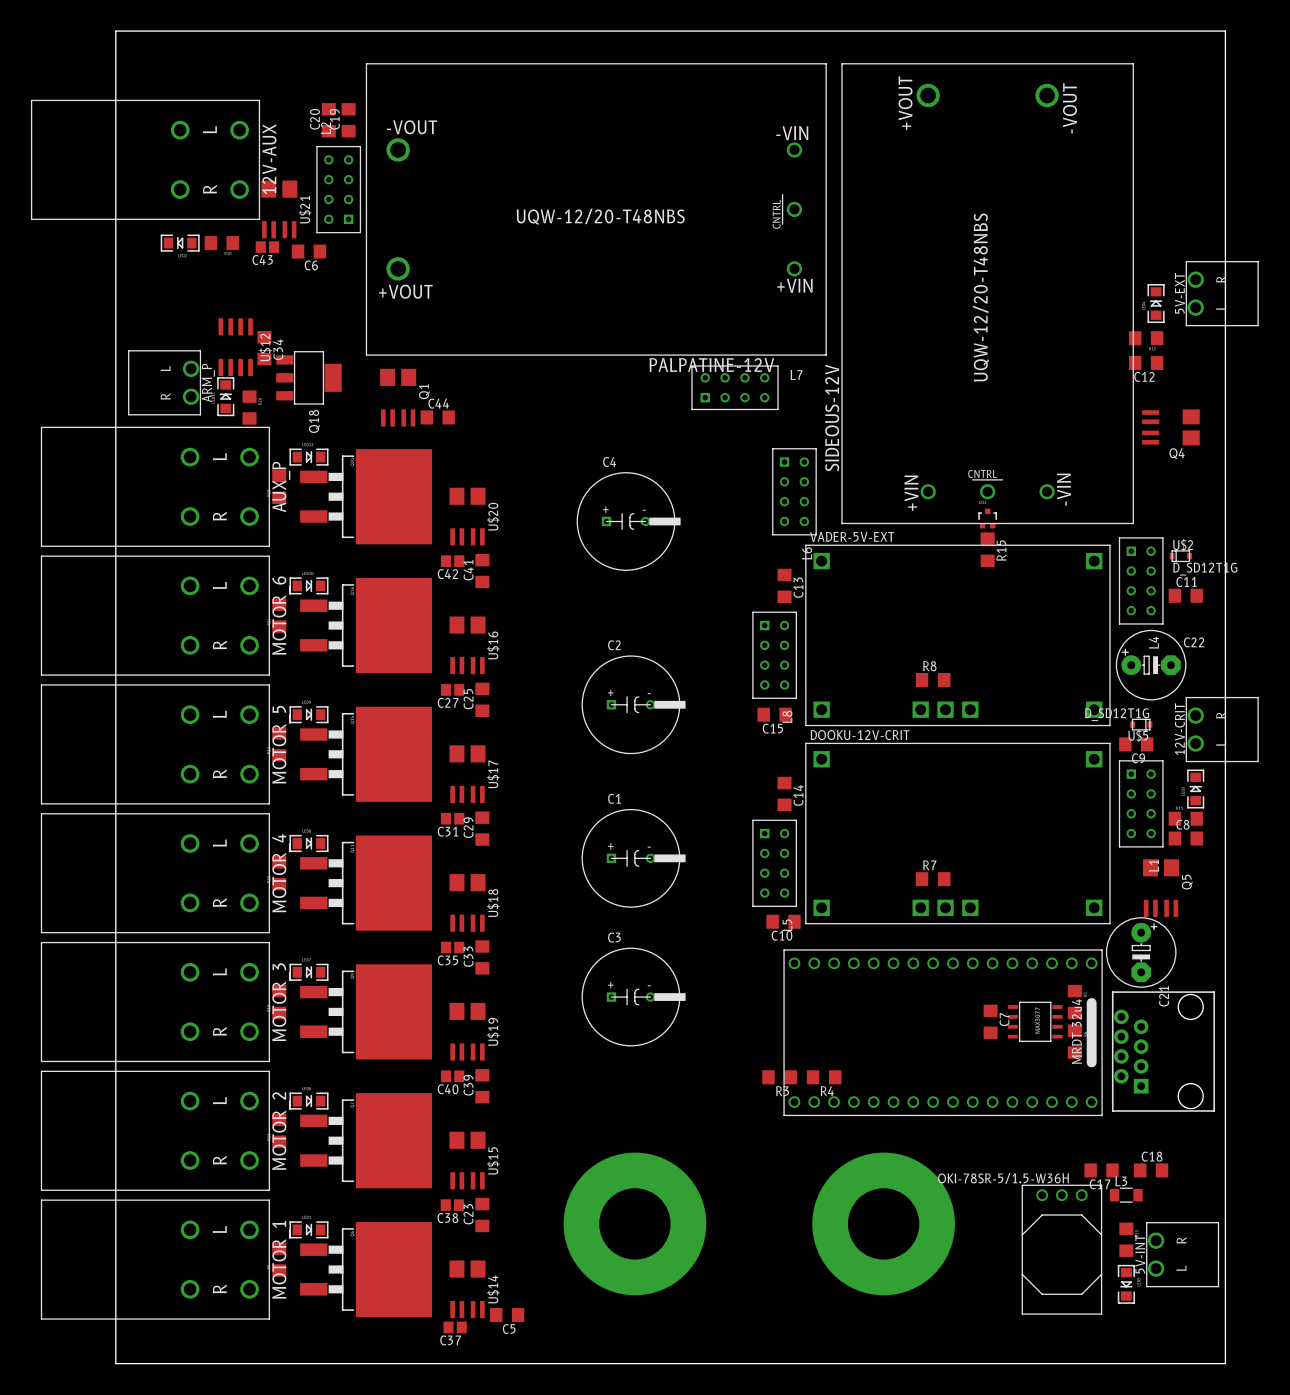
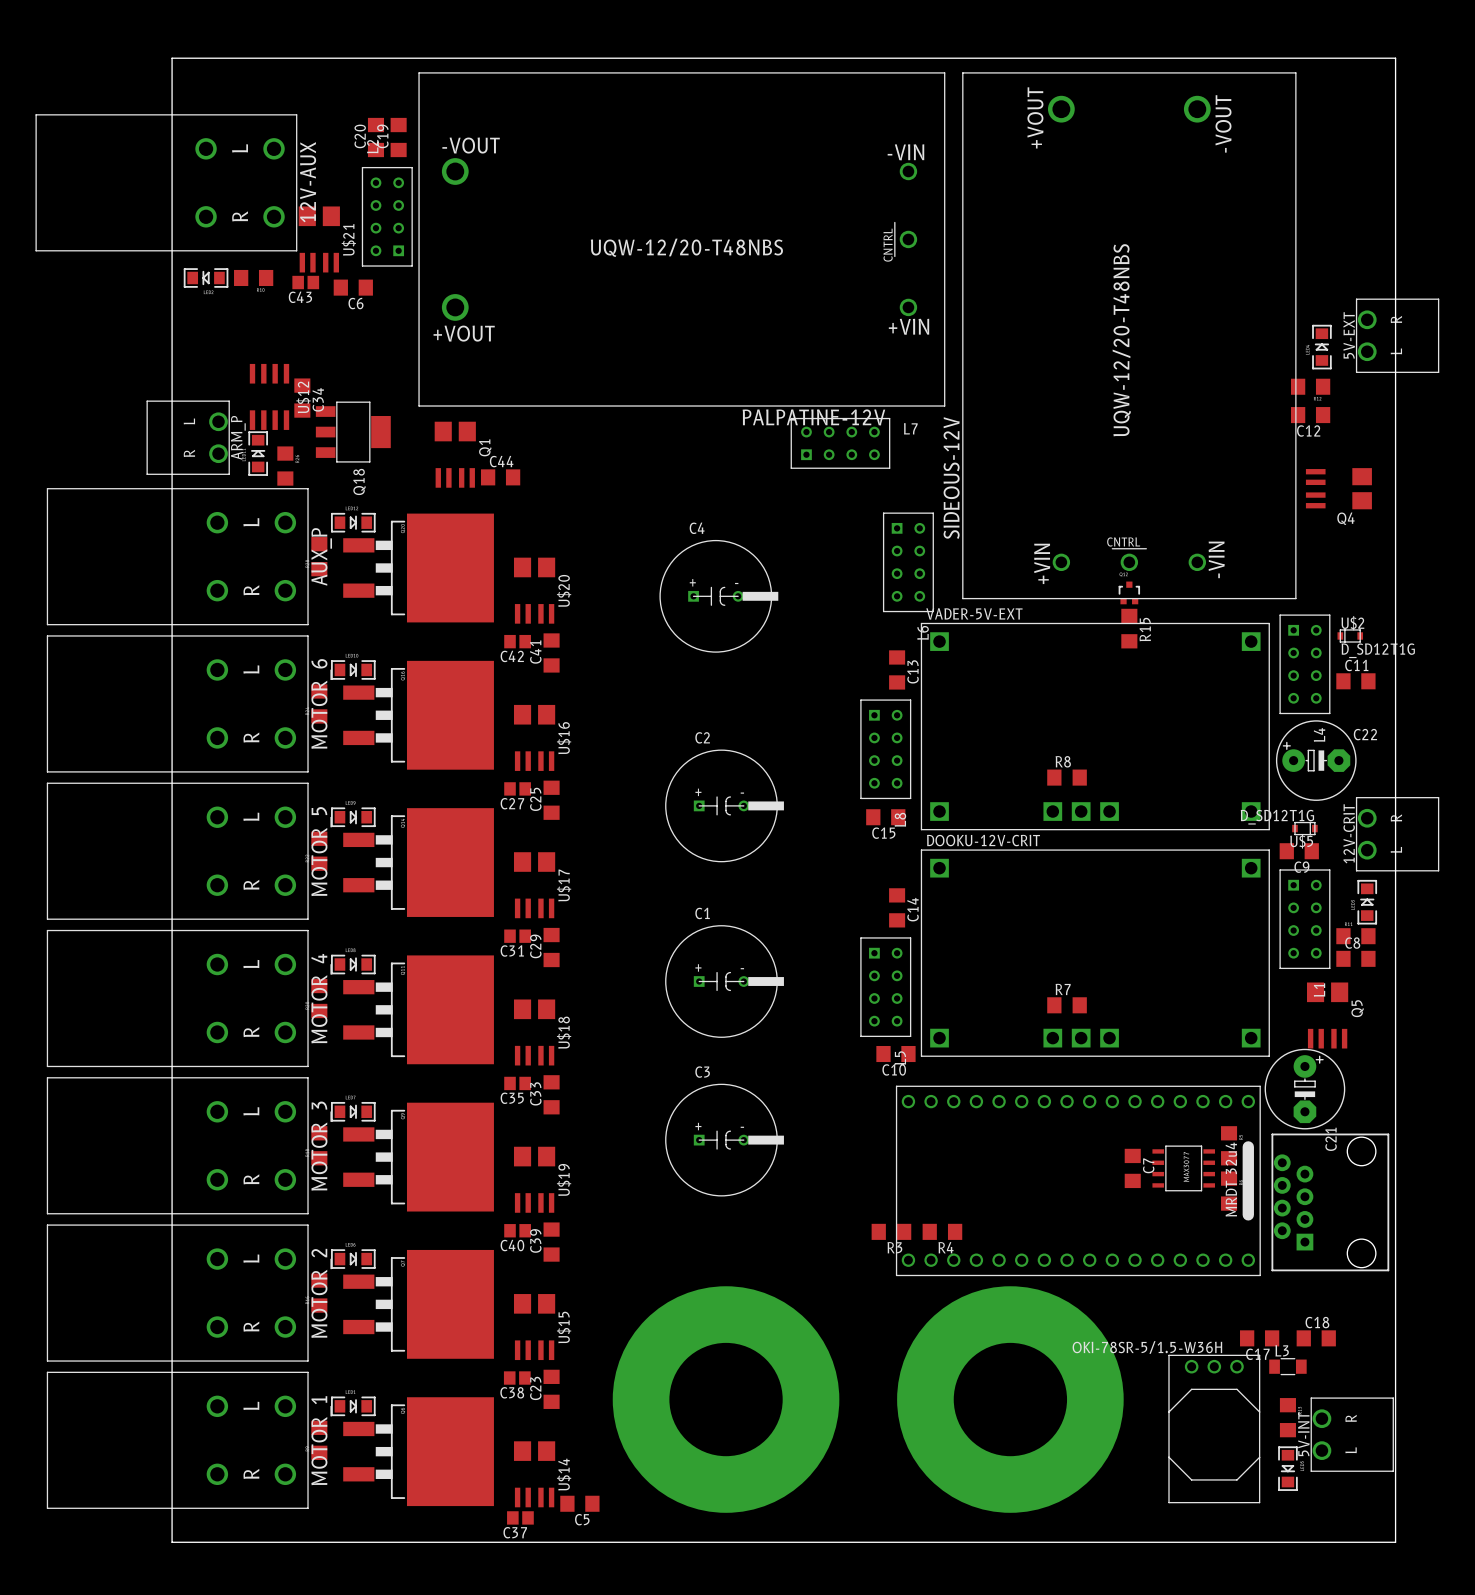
board edge: (115, 31) (1225, 31) (1225, 1363) (115, 1363) (115, 31) -> (172, 58) (172, 1542) (1395, 1542) (1395, 58) (172, 58)
part footprint: [563, 1152, 707, 1296] -> [612, 1286, 840, 1513]
part footprint: [812, 1152, 955, 1296] -> [897, 1286, 1124, 1513]

